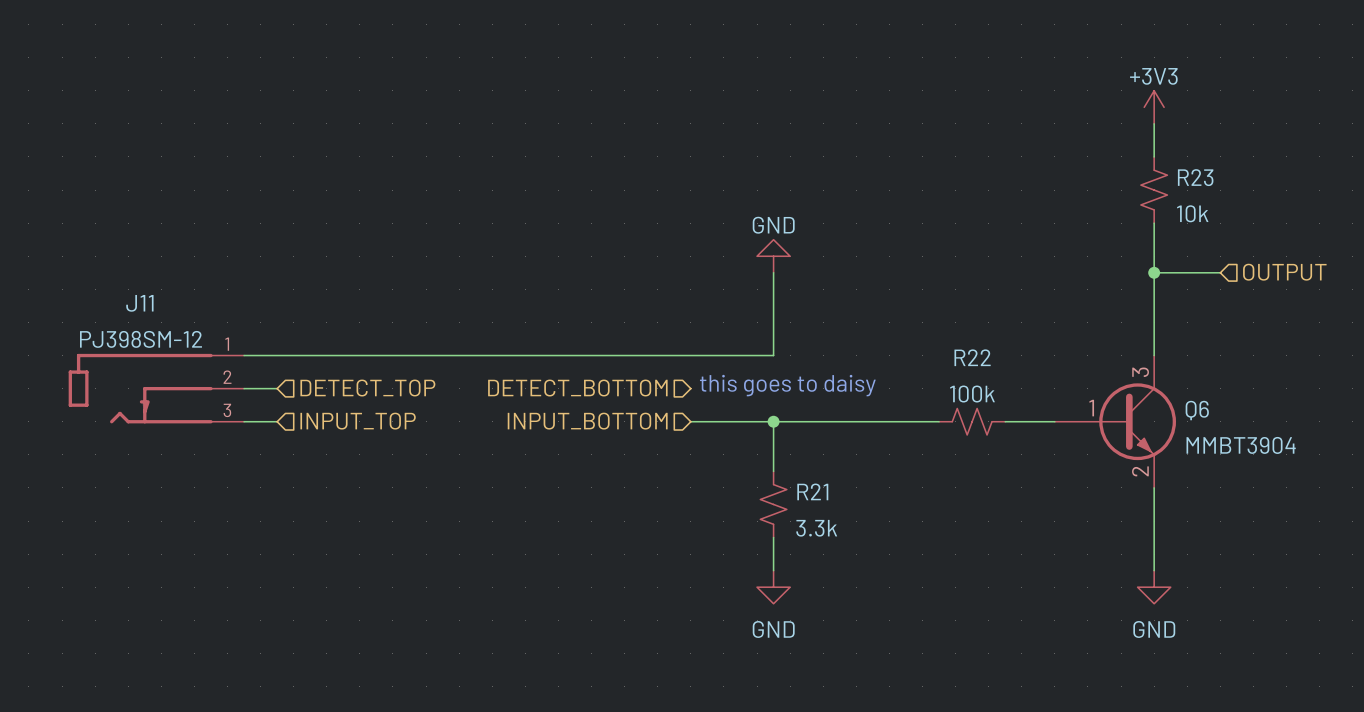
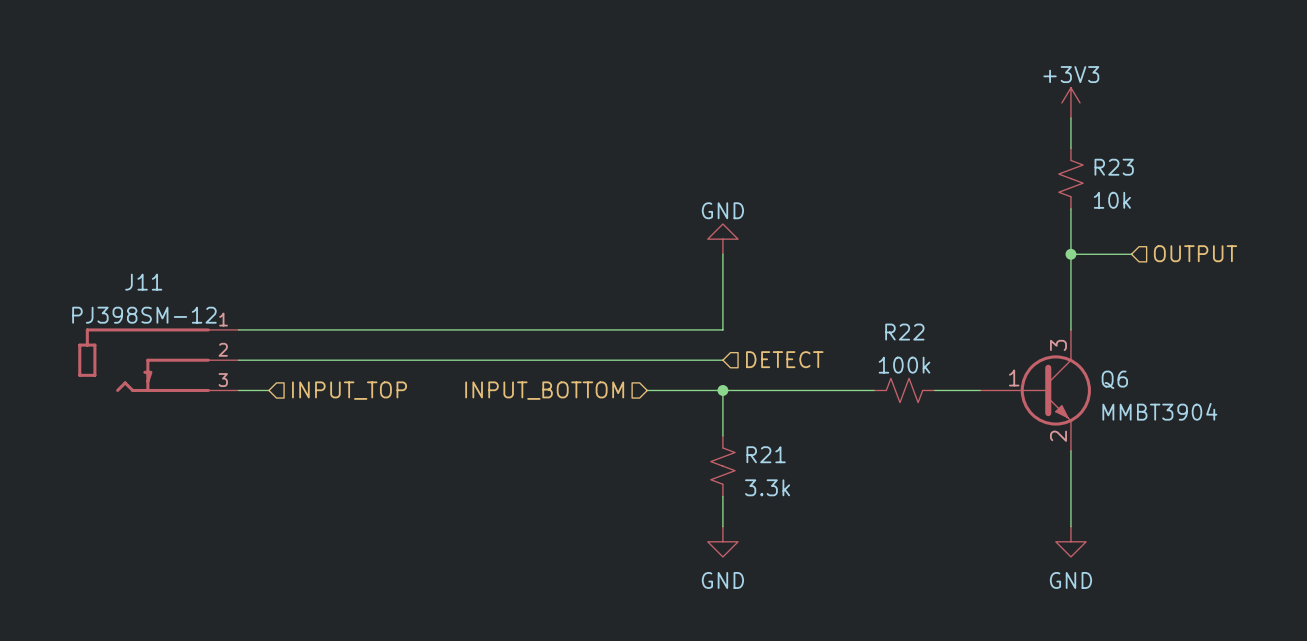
text: this goes to daisy (787, 385) -> none
wire: none -> (268, 360) (722, 360)
hierarchical label: DETECT_TOP (367, 388) -> none
hierarchical label: DETECT_BOTTOM (577, 388) -> none
hierarchical label: none -> DETECT (784, 359)

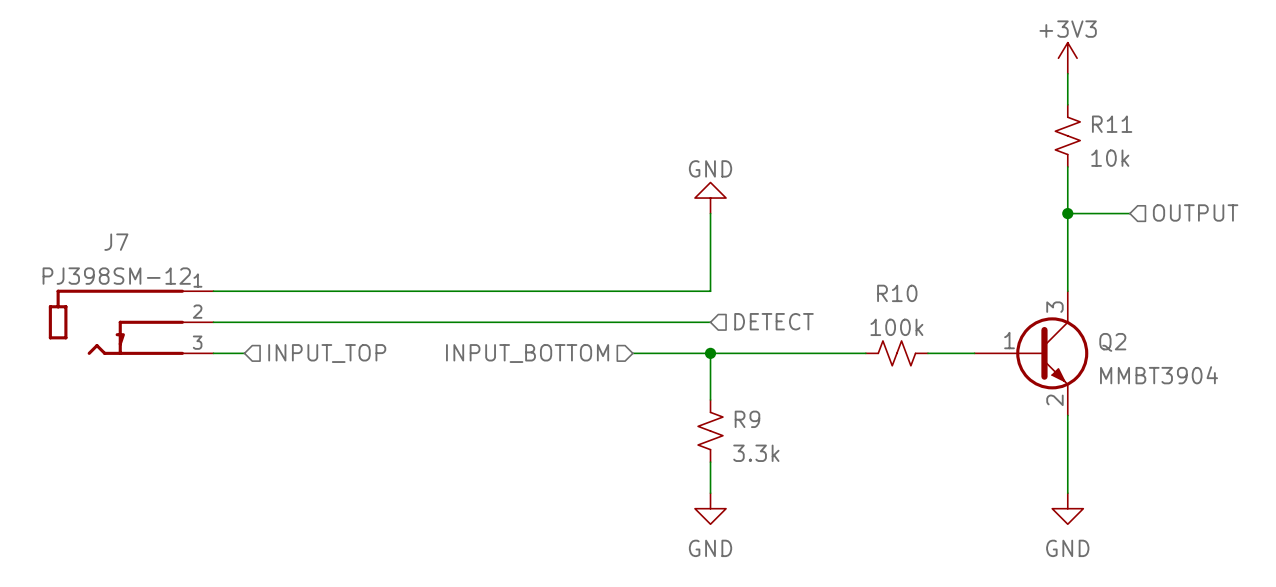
R23 name: R23 (1114, 167) -> R11 (1112, 124)
J11 name: J11 (143, 282) -> J7 (116, 242)
R22 name: R22 (904, 332) -> R10 (897, 293)
Q6 name: Q6 (1114, 379) -> Q2 (1112, 342)
R21 name: R21 (766, 454) -> R9 (747, 419)

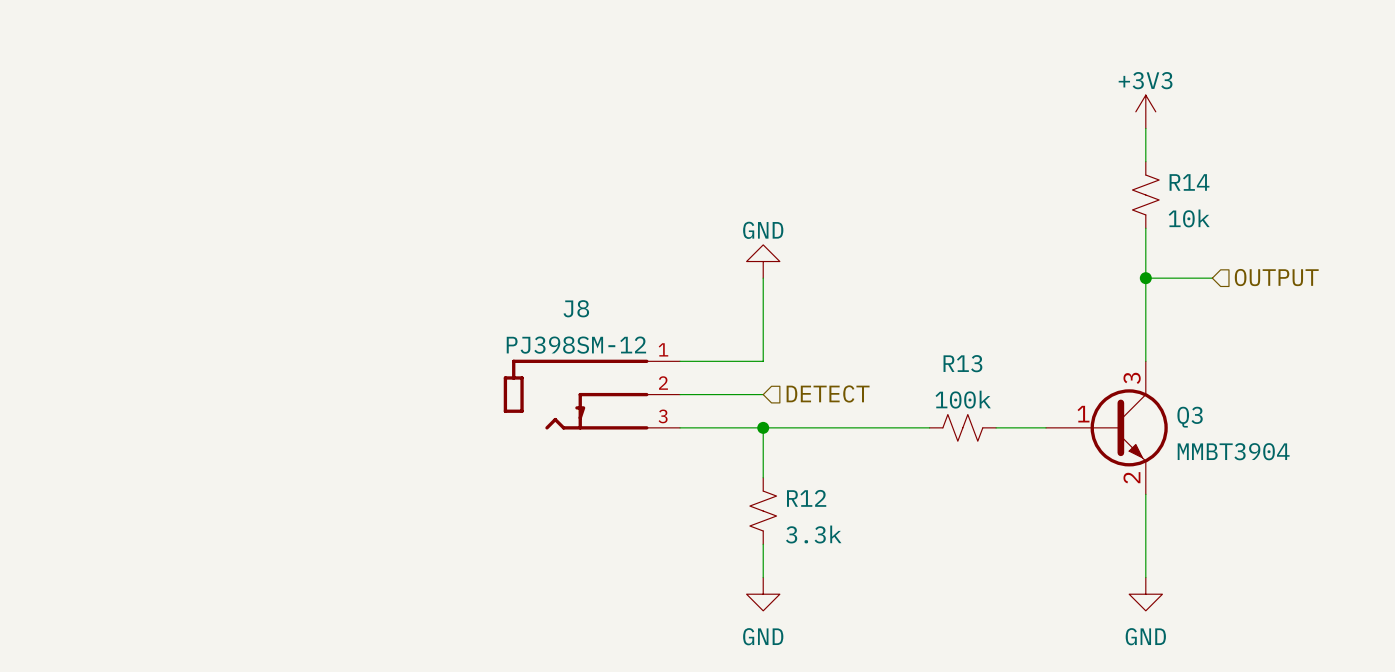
R11 name: R11 (1112, 124) -> R14 (1189, 182)
wire: (213, 291) (632, 291) -> none
R10 name: R10 (897, 293) -> R13 (962, 363)
J7: PJ398SM-12 (131, 322) -> none
wire: (213, 322) (632, 322) -> none
J8: none -> PJ398SM-12 (591, 394)
Q2 name: Q2 (1112, 342) -> Q3 (1190, 417)
wire: (213, 353) (244, 353) -> none
hierarchical label: INPUT_TOP (327, 353) -> none
hierarchical label: INPUT_BOTTOM (527, 353) -> none
R9 name: R9 (747, 419) -> R12 (806, 498)

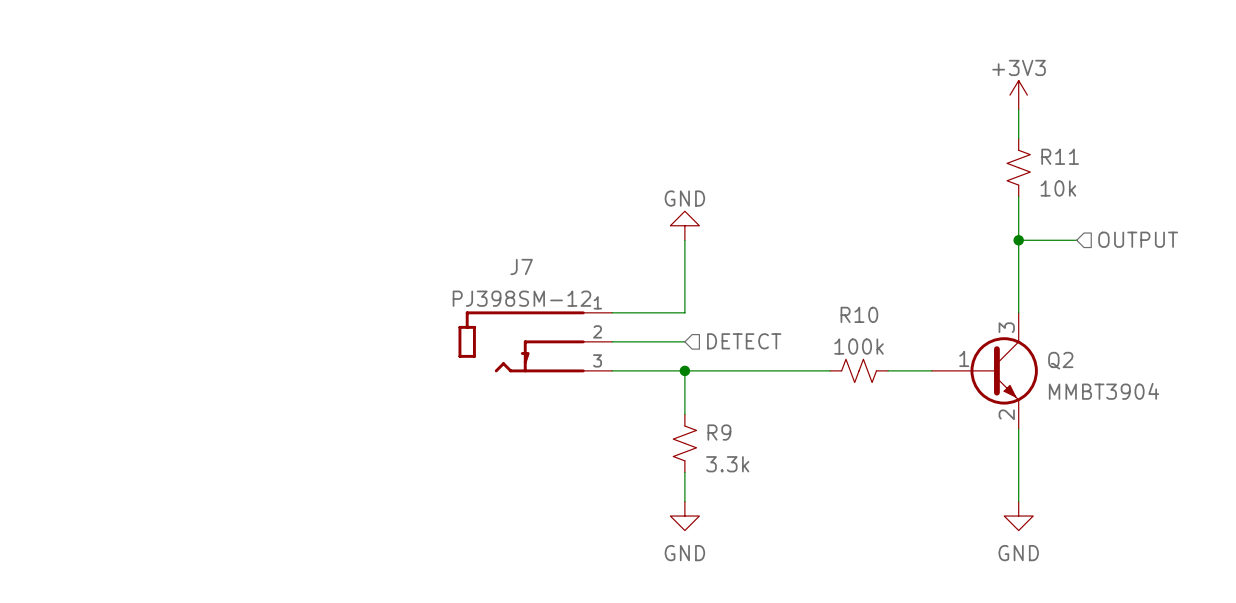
R14 name: R14 (1189, 182) -> R11 (1060, 156)
J8 name: J8 (576, 308) -> J7 (521, 266)
R13 name: R13 (962, 363) -> R10 (859, 314)
Q3 name: Q3 (1190, 417) -> Q2 (1060, 360)
R12 name: R12 (806, 498) -> R9 (719, 432)

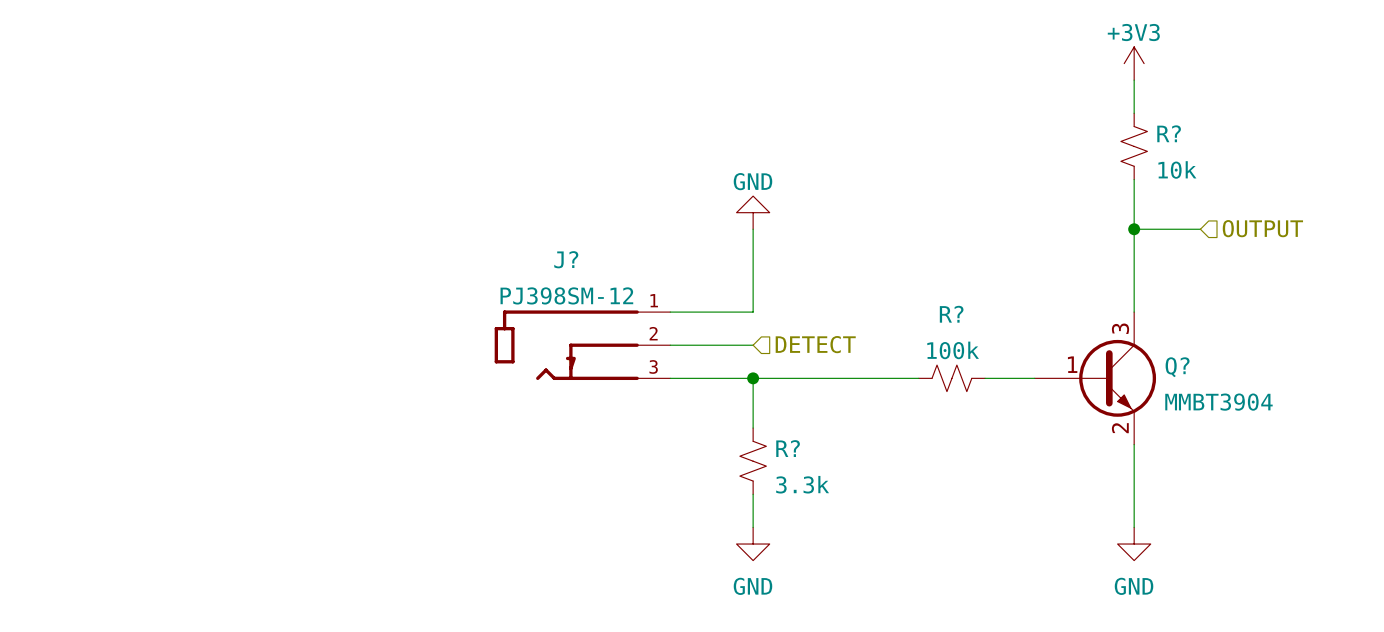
R11 name: R11 (1060, 156) -> R? (1169, 133)
J7 name: J7 (521, 266) -> J? (566, 259)
R10 name: R10 (859, 314) -> R? (951, 314)
Q2 name: Q2 (1060, 360) -> Q? (1177, 367)
R9 name: R9 (719, 432) -> R? (788, 448)

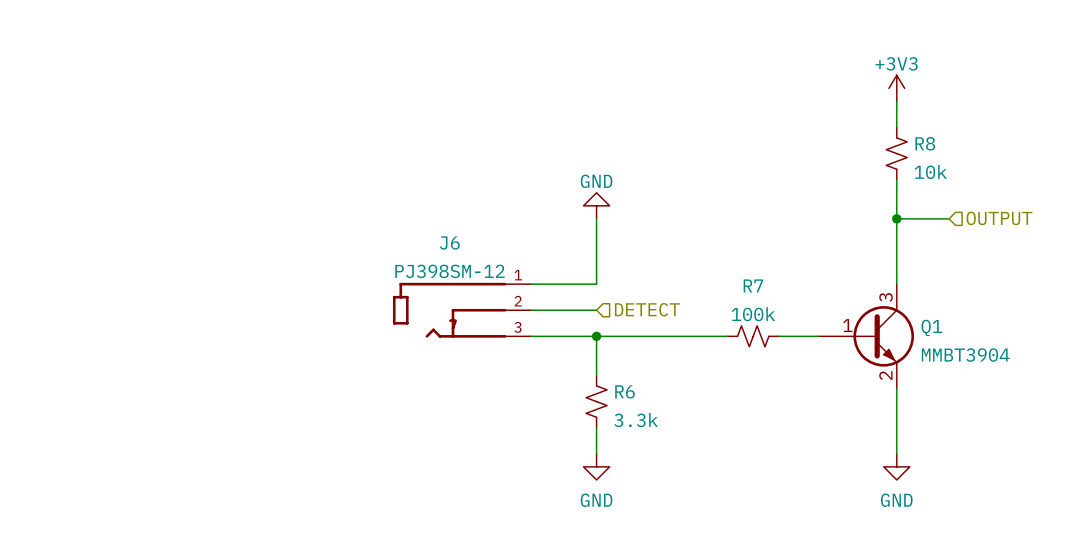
R? name: R? (1169, 133) -> R8 (925, 143)
J? name: J? (566, 259) -> J6 (449, 242)
R? name: R? (951, 314) -> R7 (753, 285)
Q? name: Q? (1177, 367) -> Q1 (931, 327)
R? name: R? (788, 448) -> R6 (625, 391)

